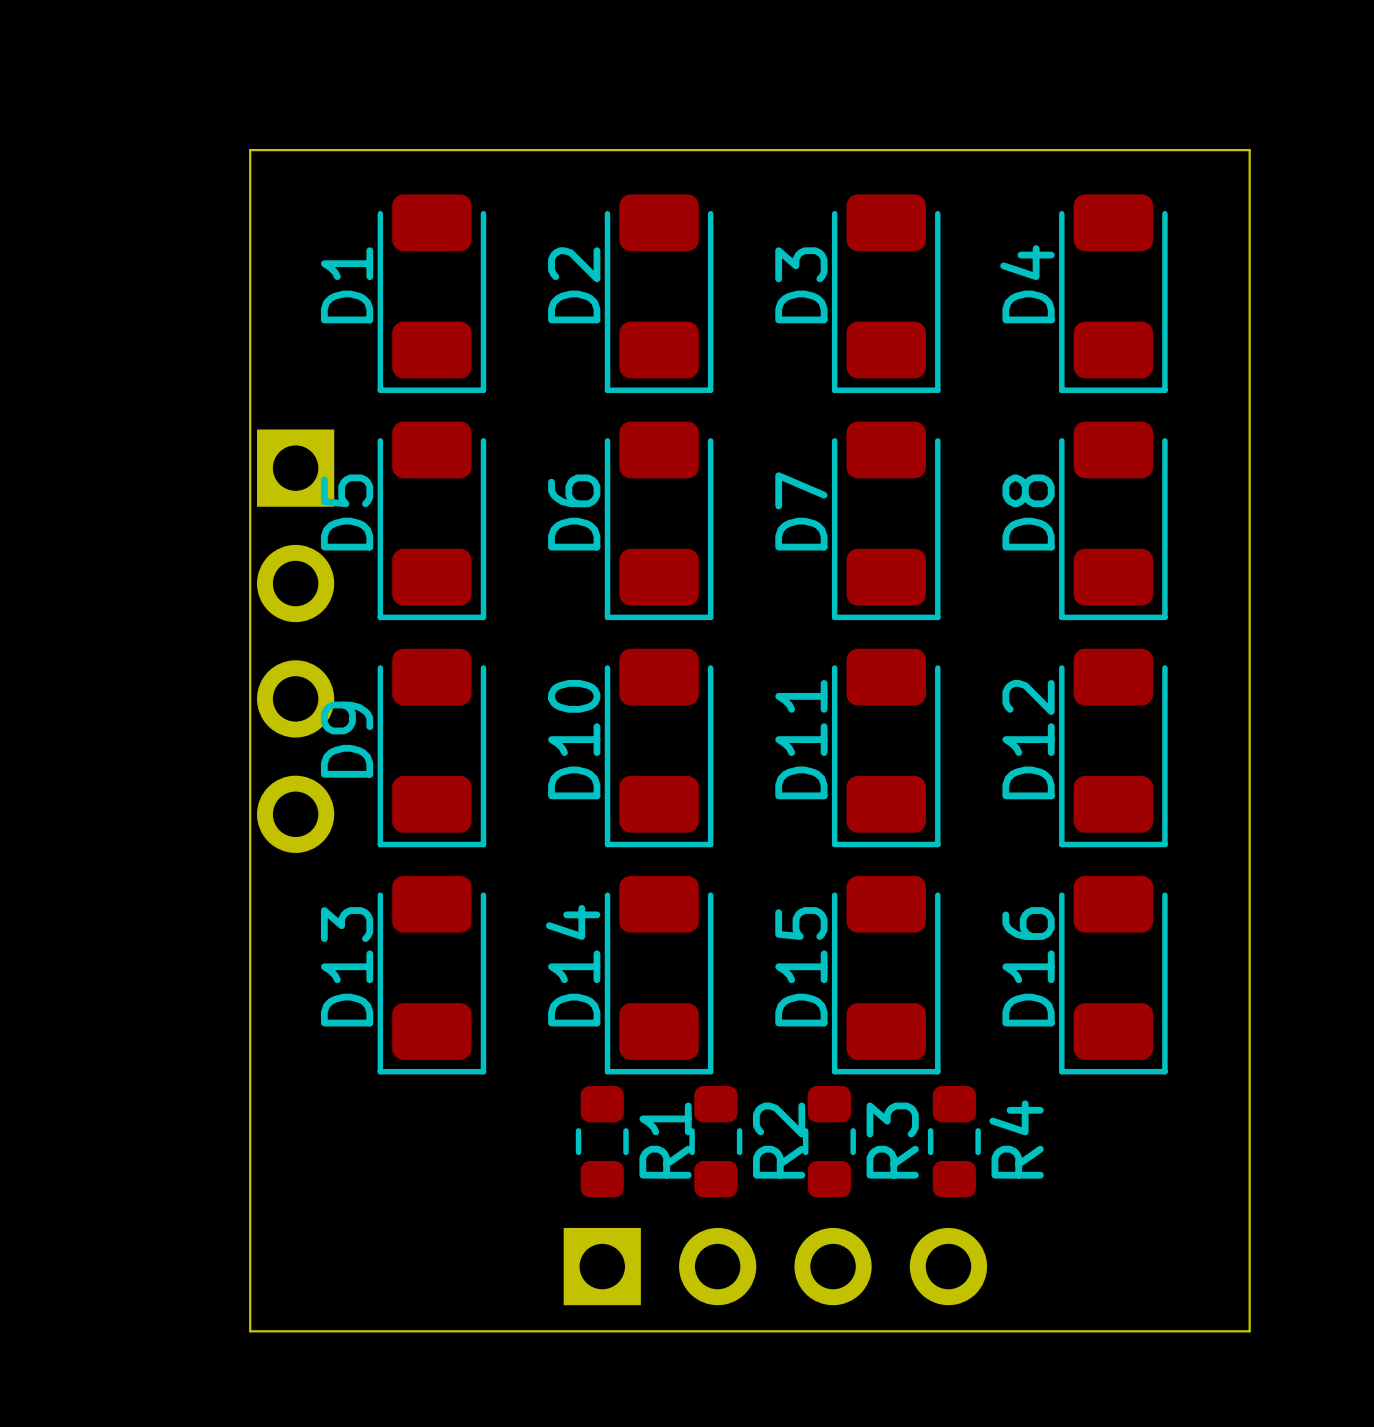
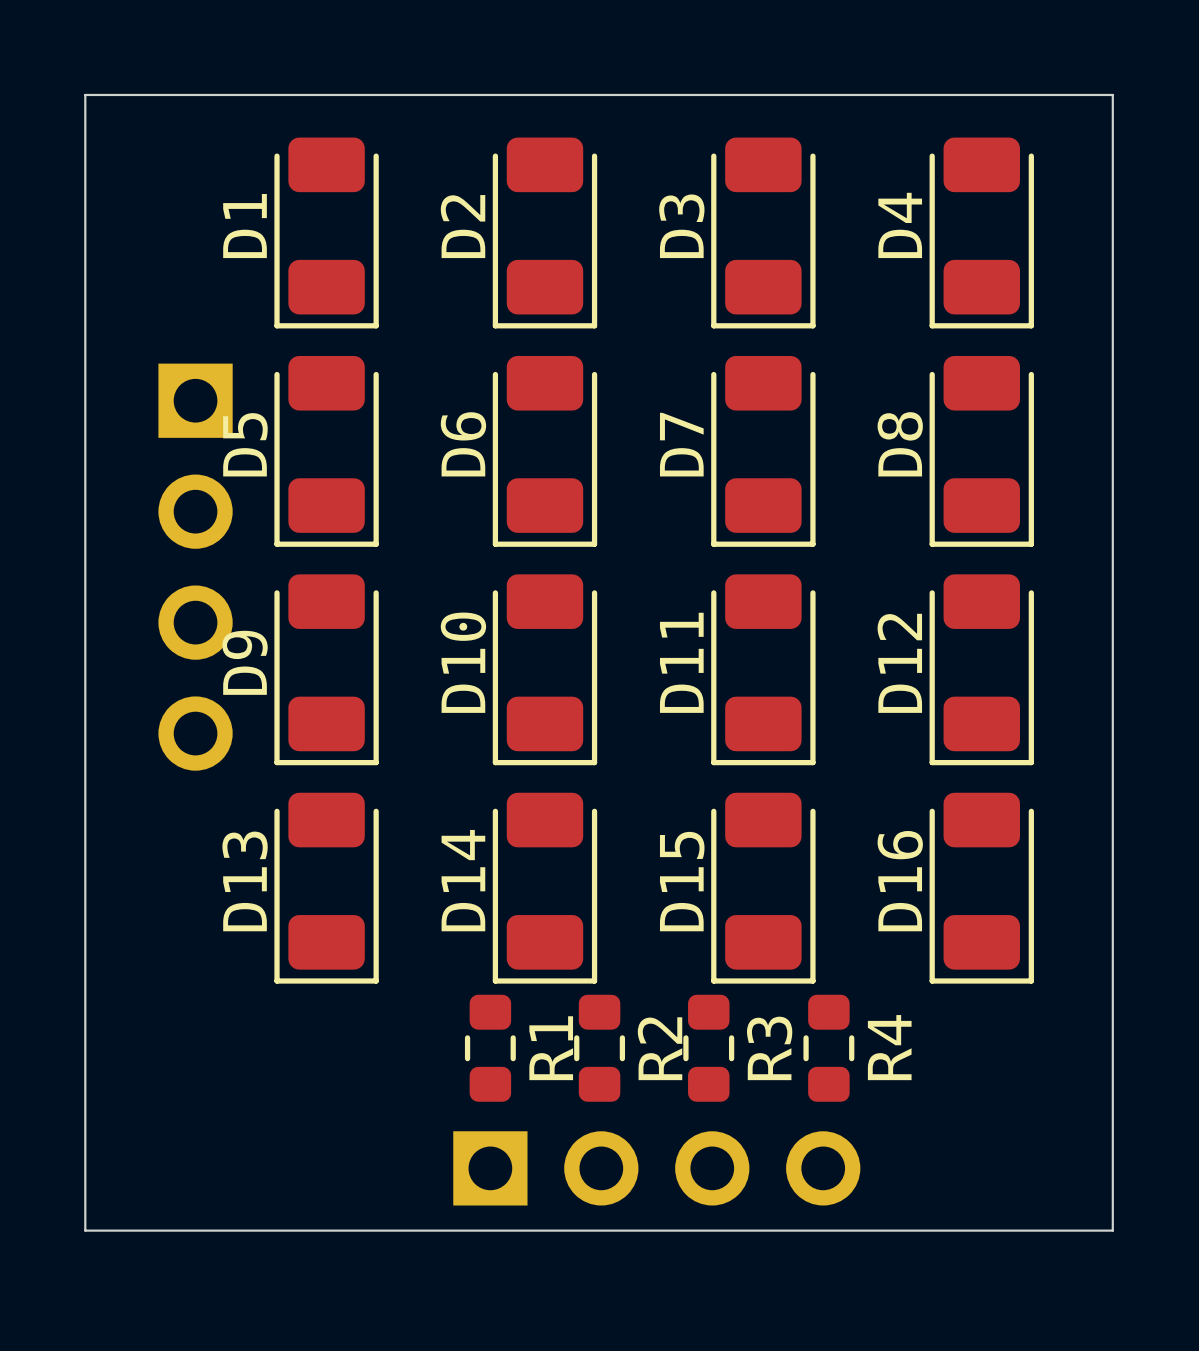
board edge: (250, 150) (250, 1331) -> (151, 94) (85, 94) (85, 1230) (151, 1230)

